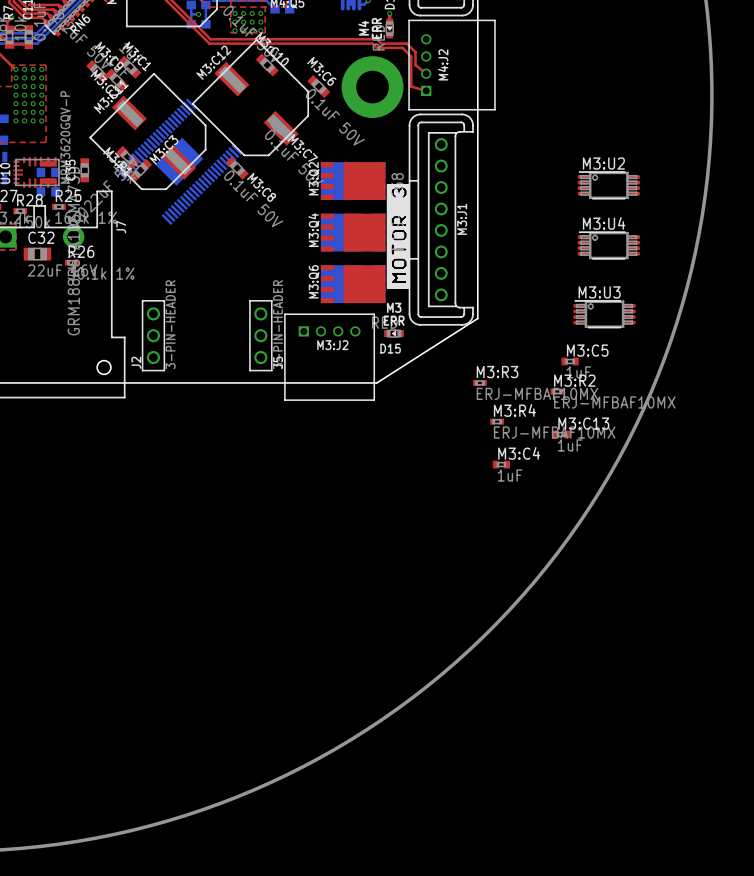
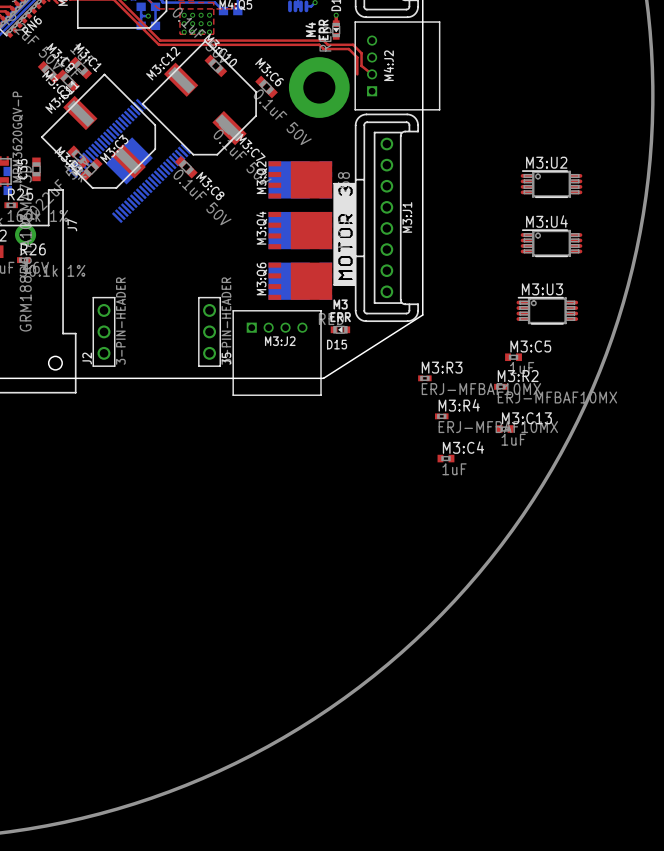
top track: (411, 73) (411, 86) (426, 90) -> none

